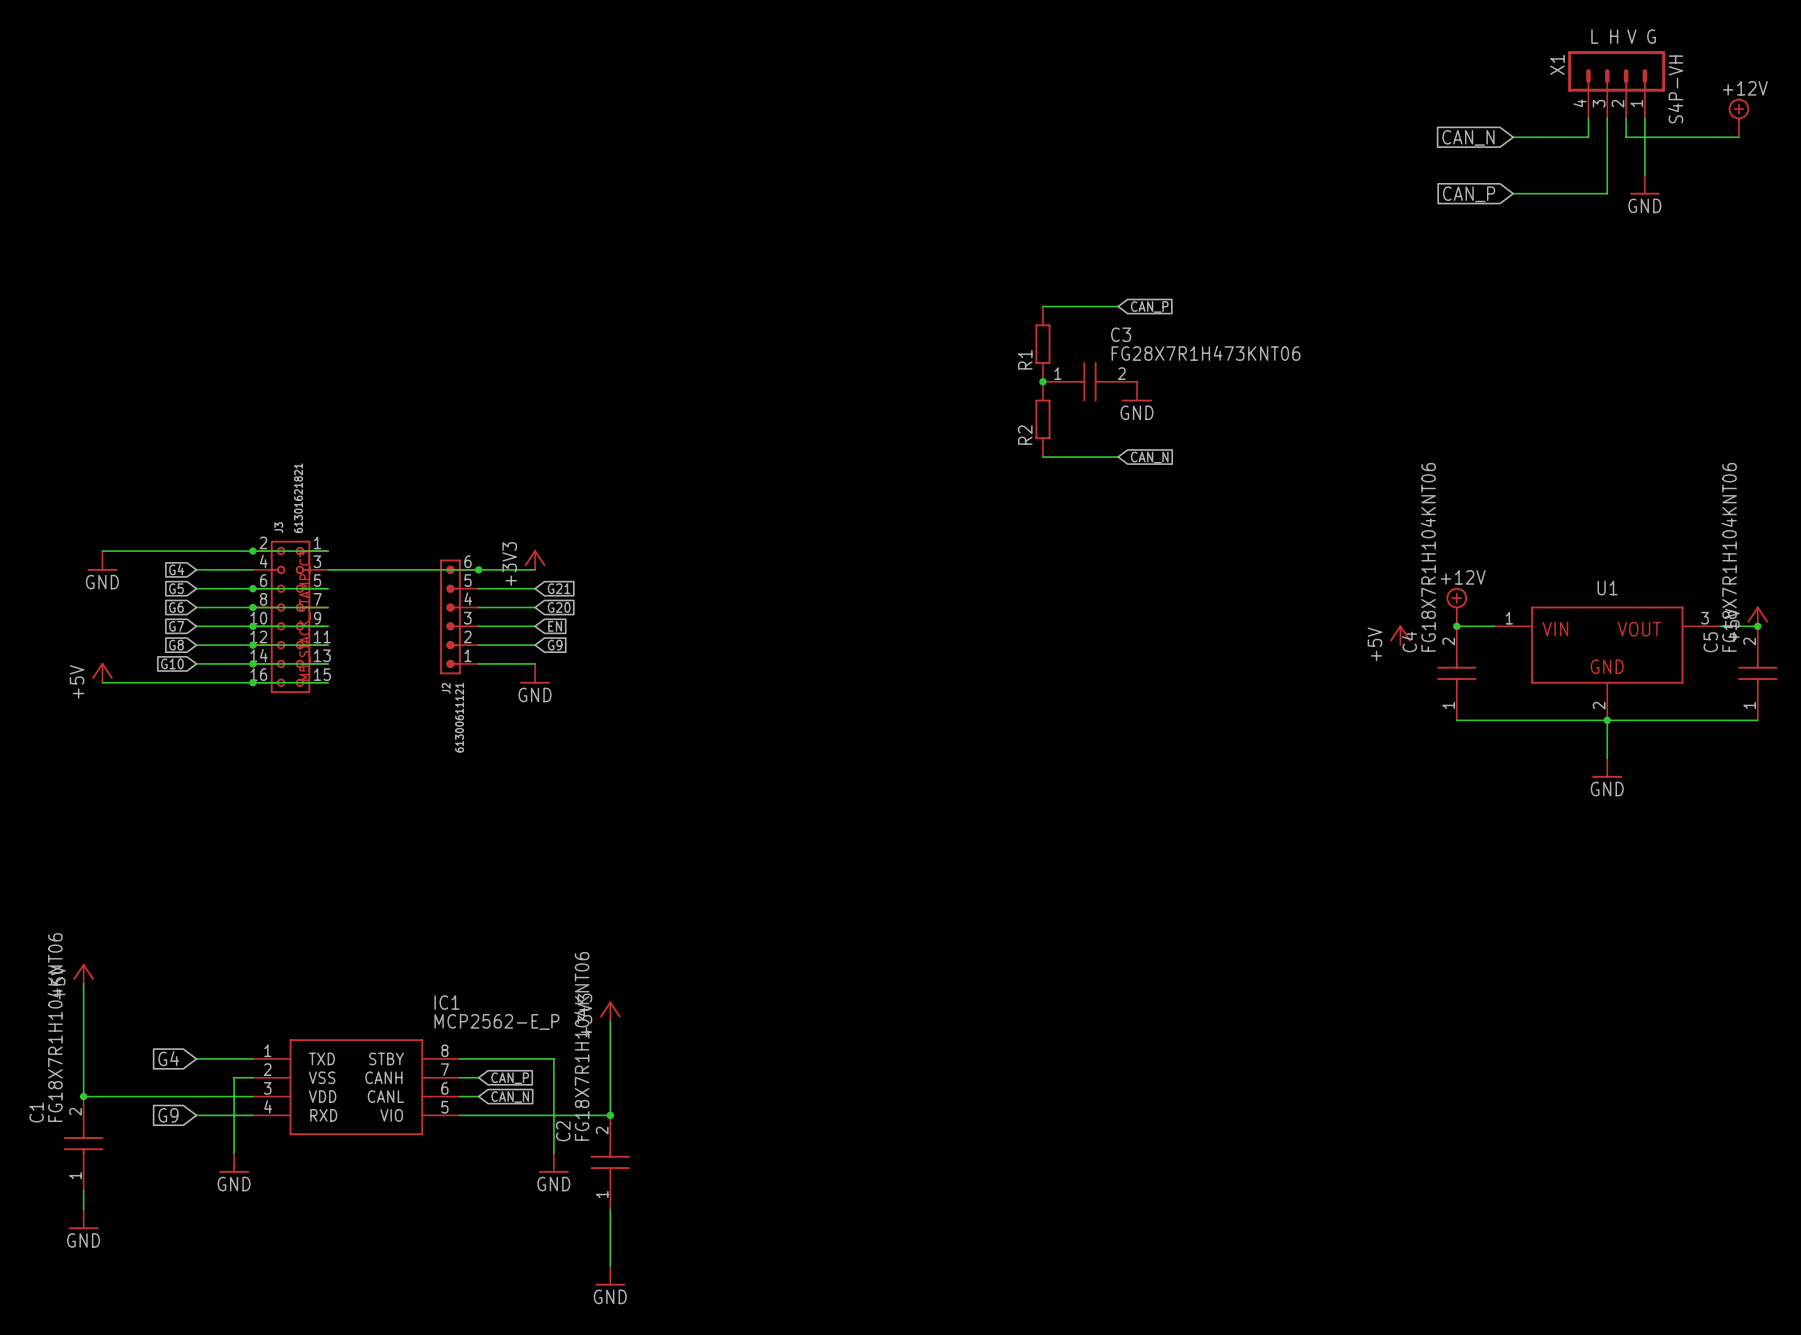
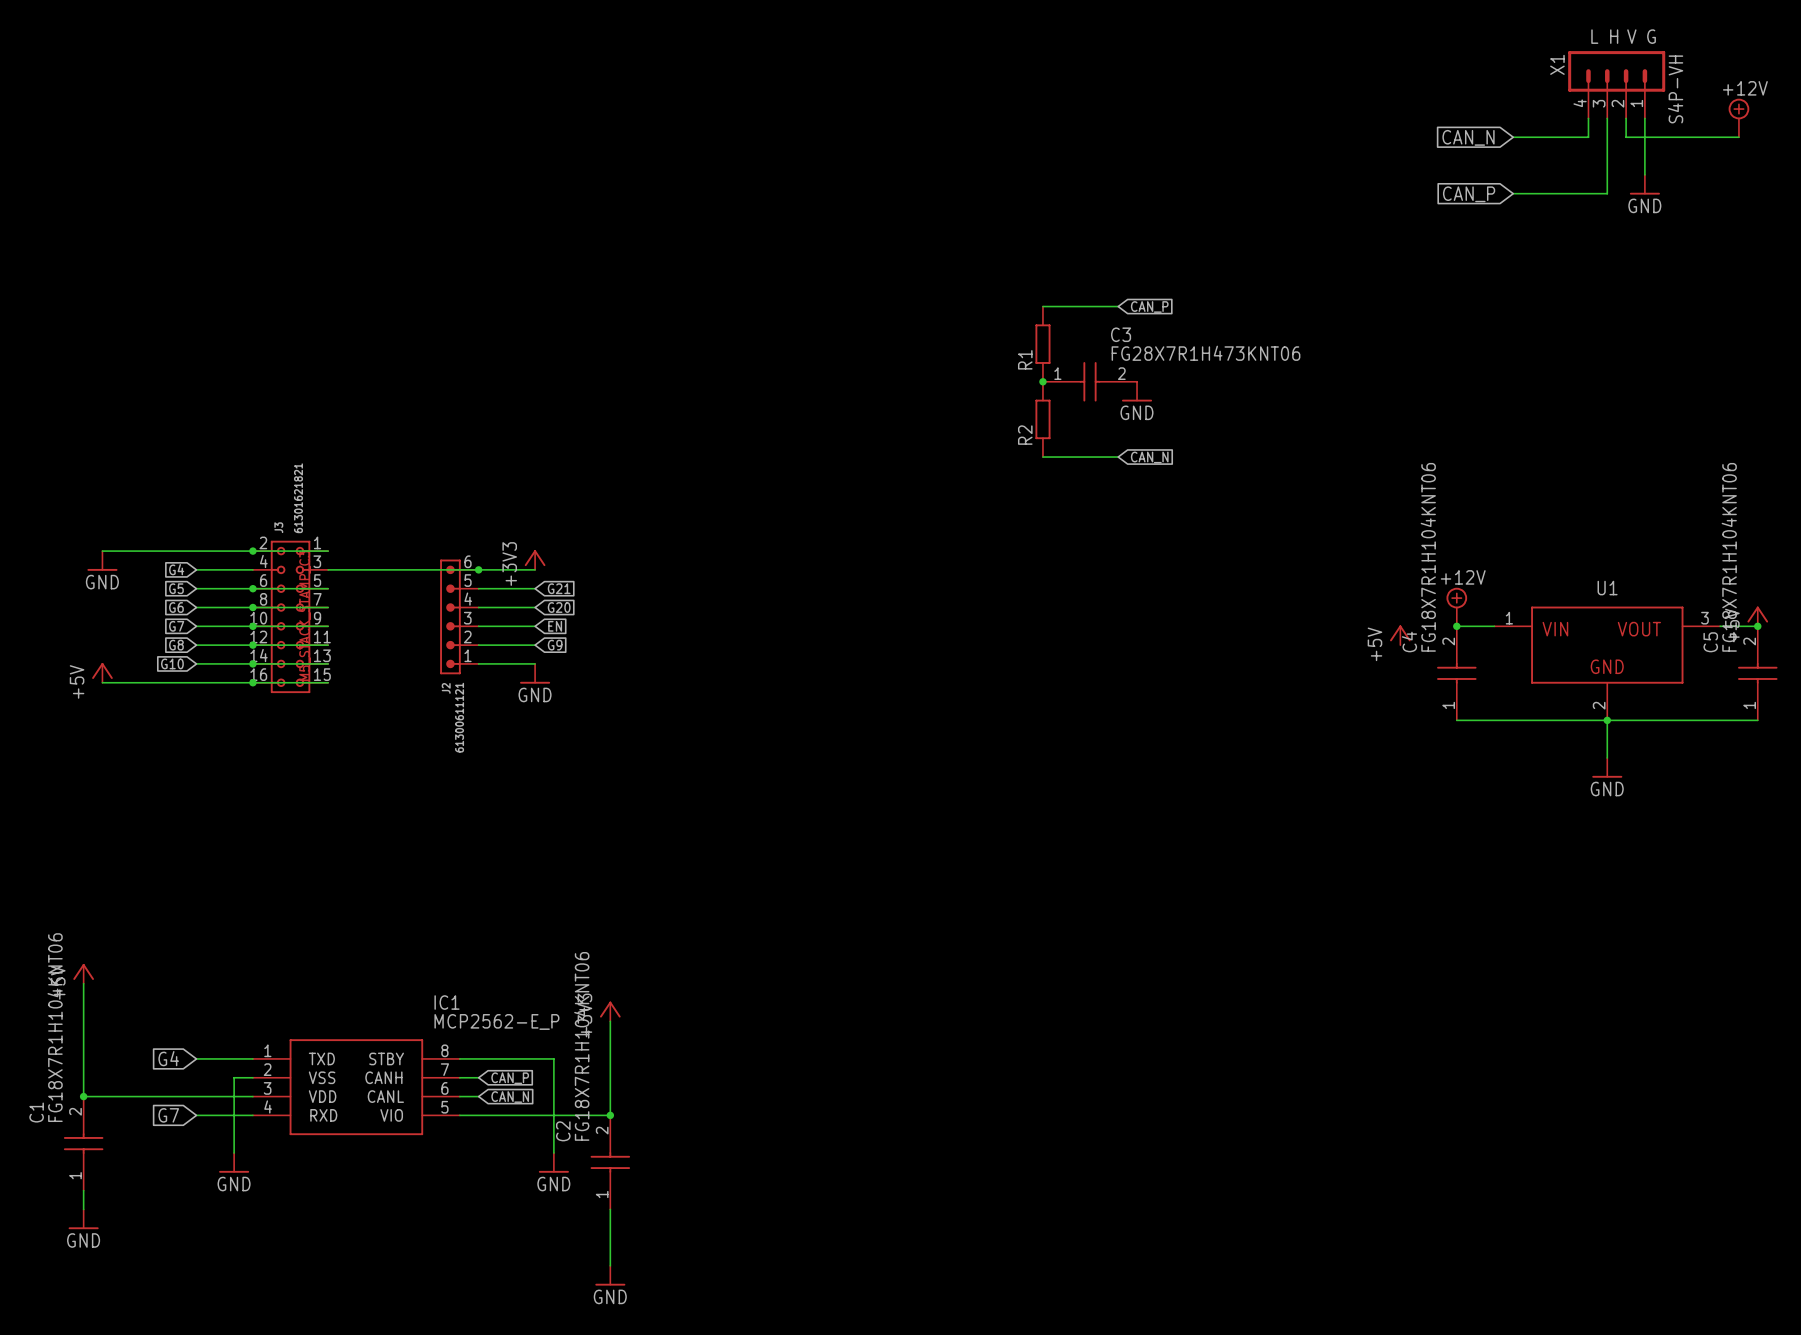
global label: G9 (168, 1115) -> G7 (168, 1115)

